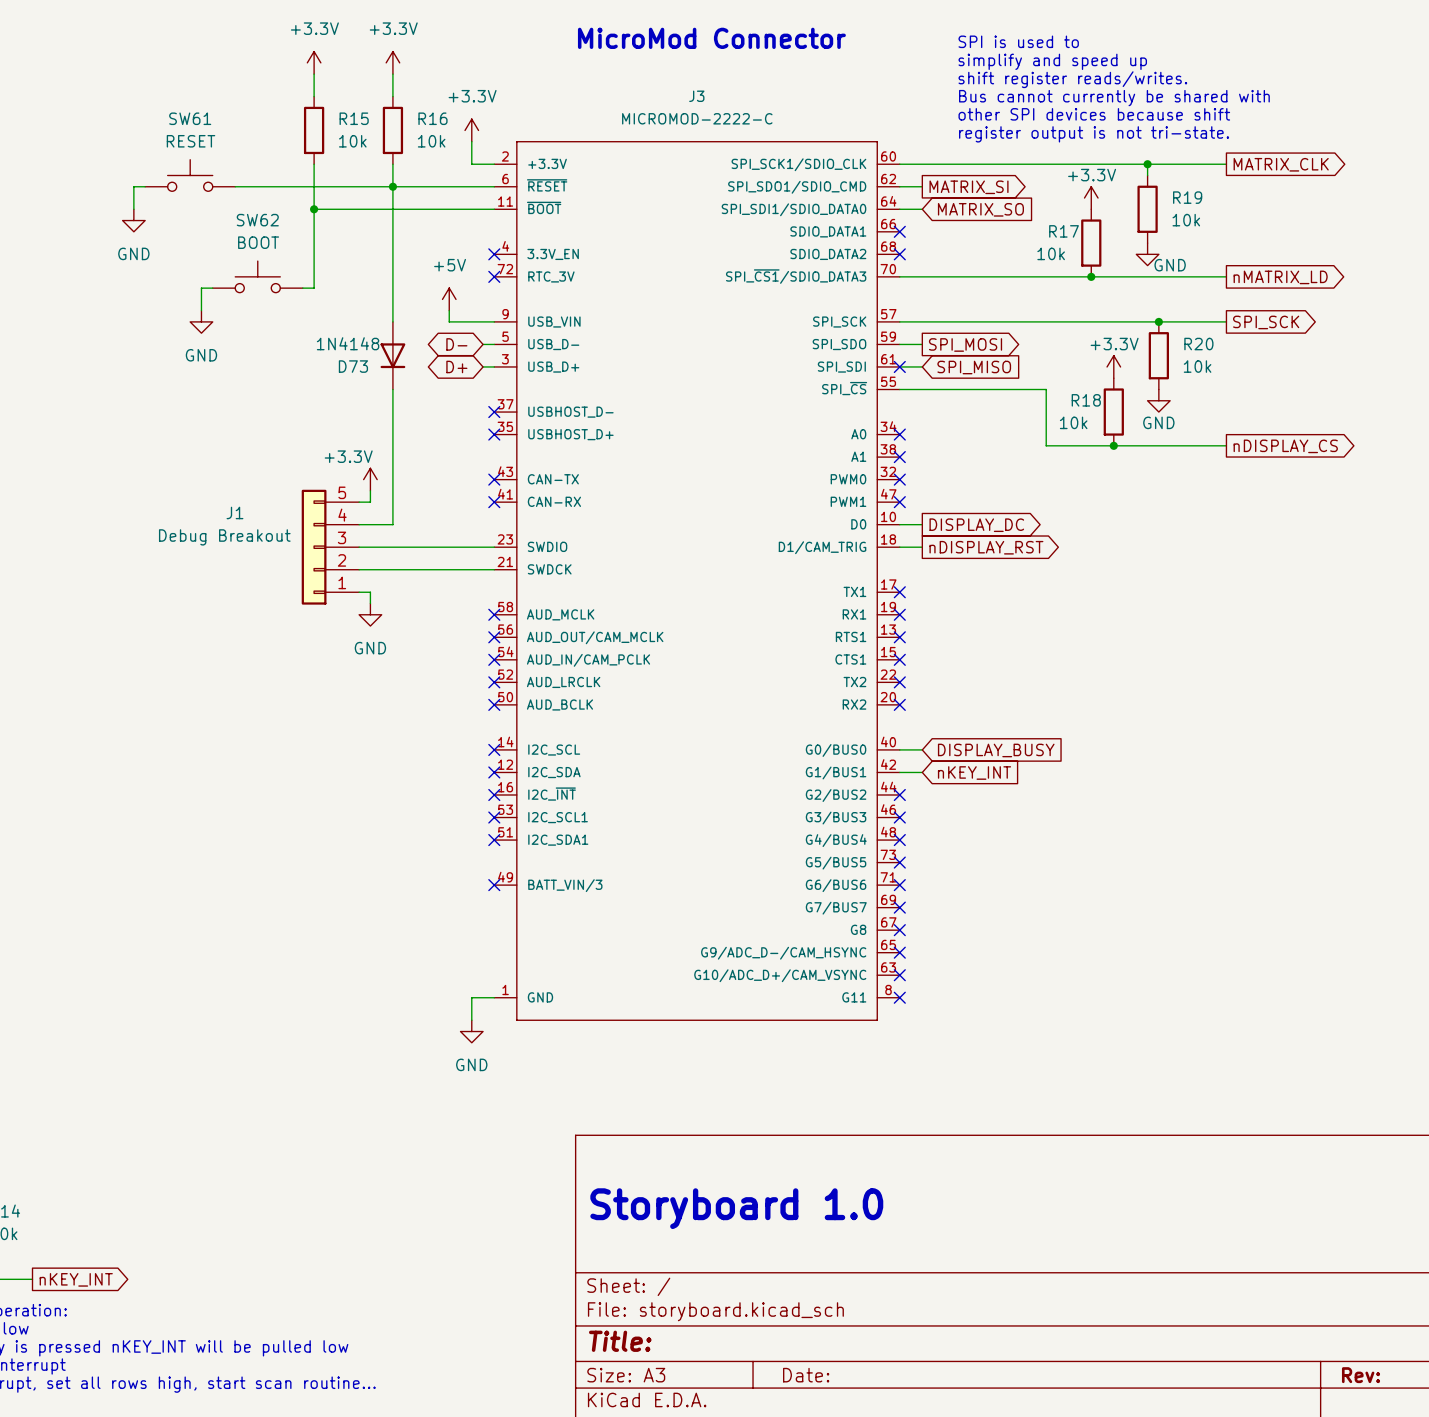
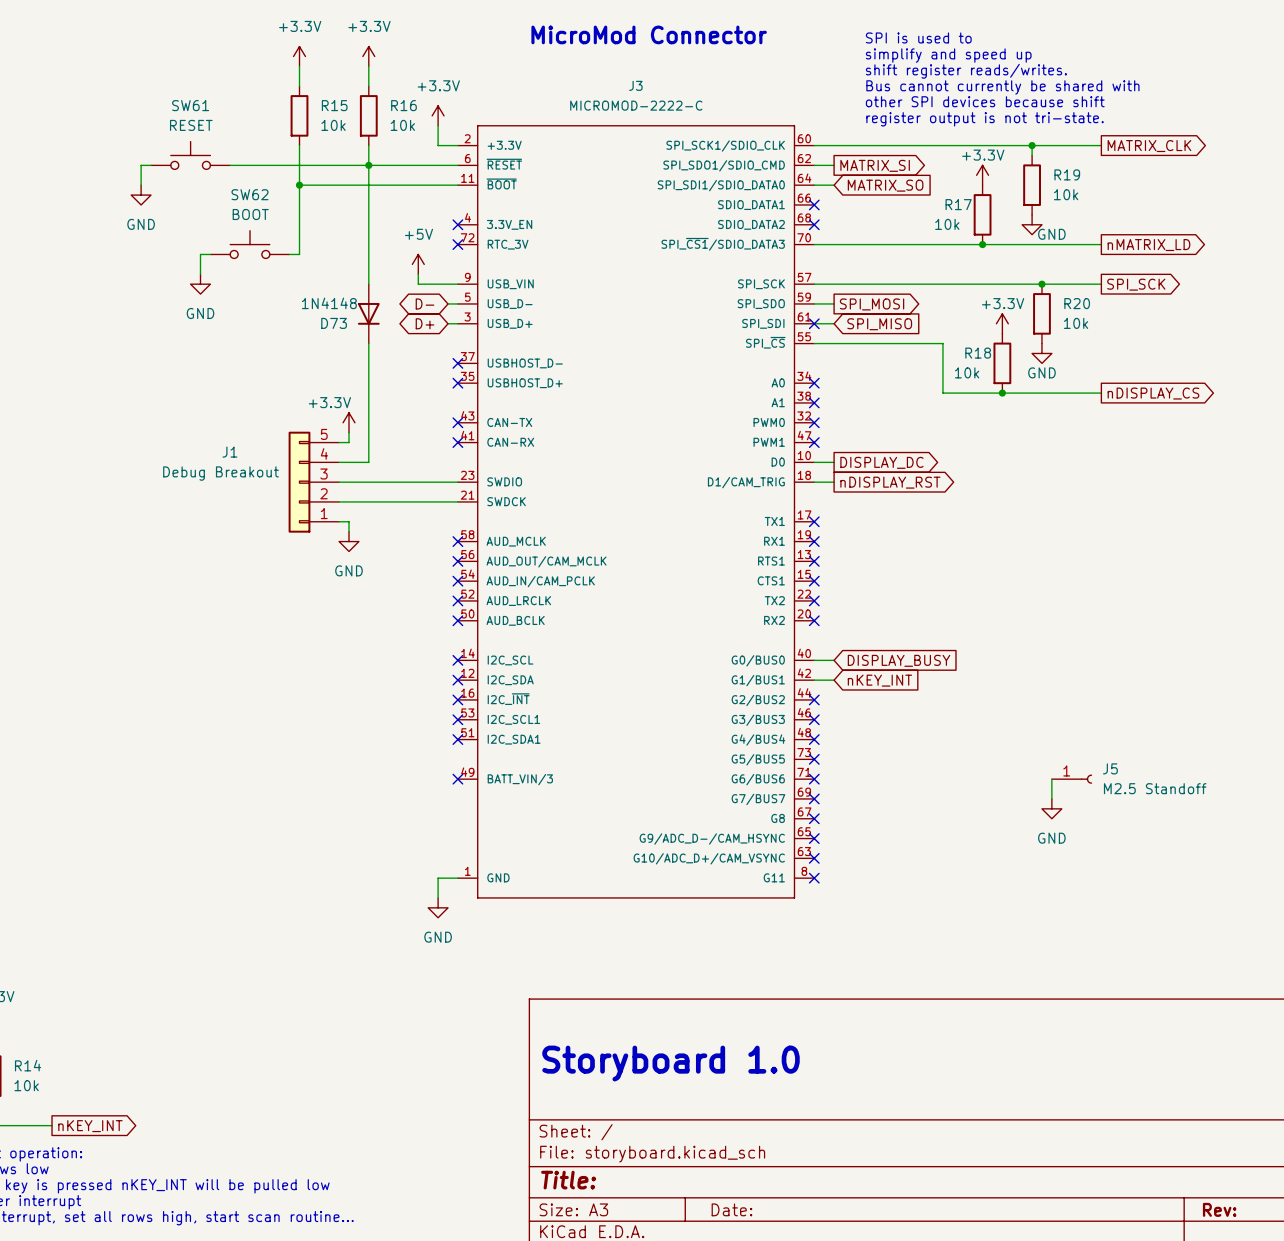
wire: none -> (1051, 779) (1051, 798)
J5: none -> M2.5 Standoff (1071, 779)
power symbol: none -> GND (1051, 808)

